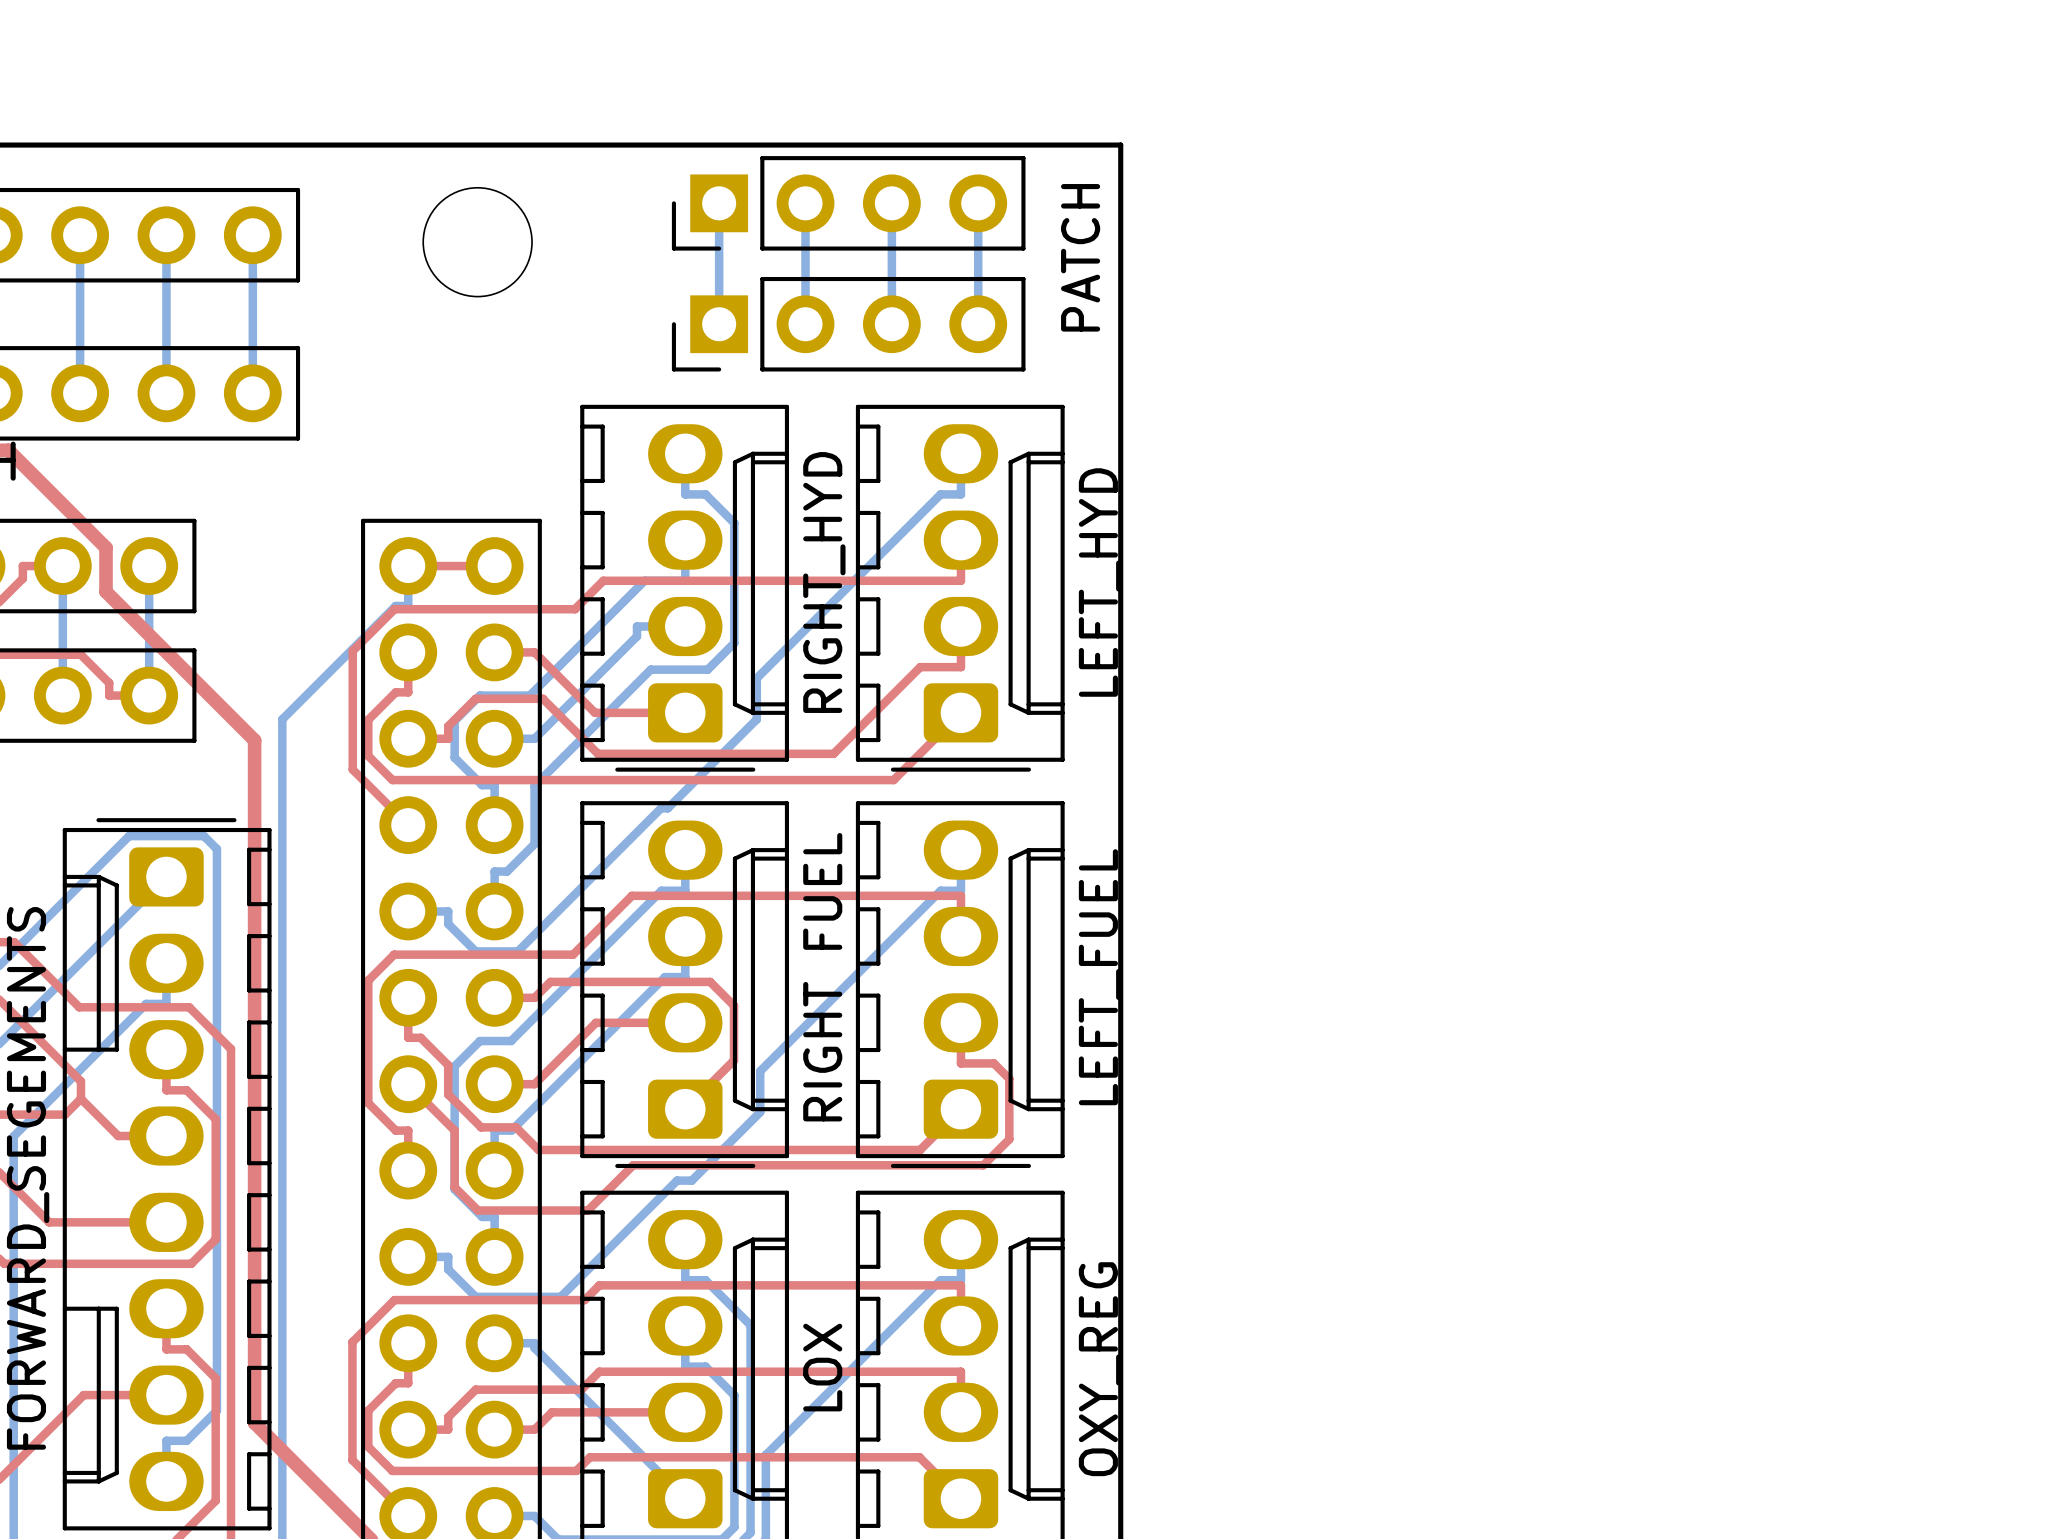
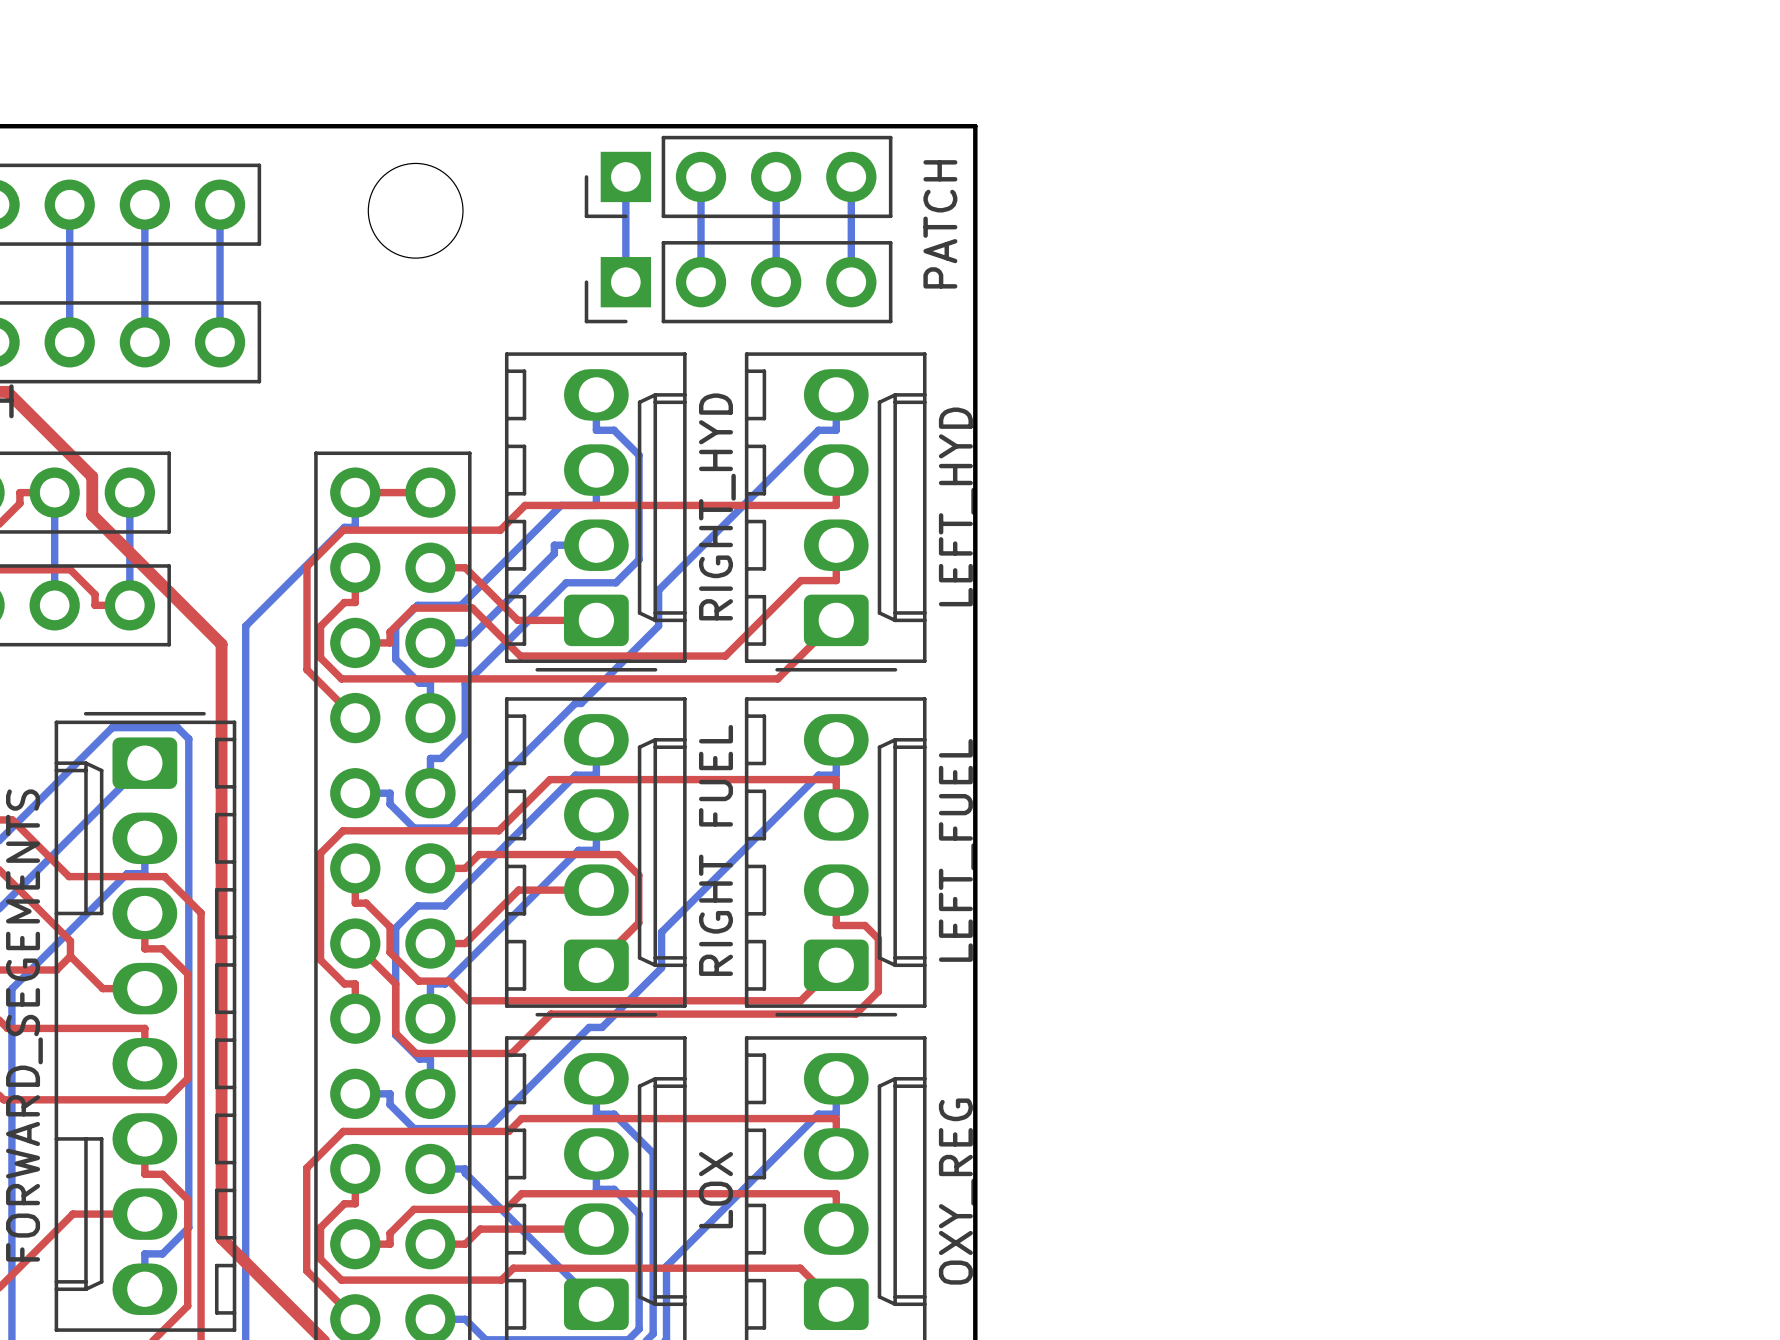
top track: (8, 1181) (49, 1222) (166, 1222) -> (7, 1028) (144, 1028) (144, 1063)

